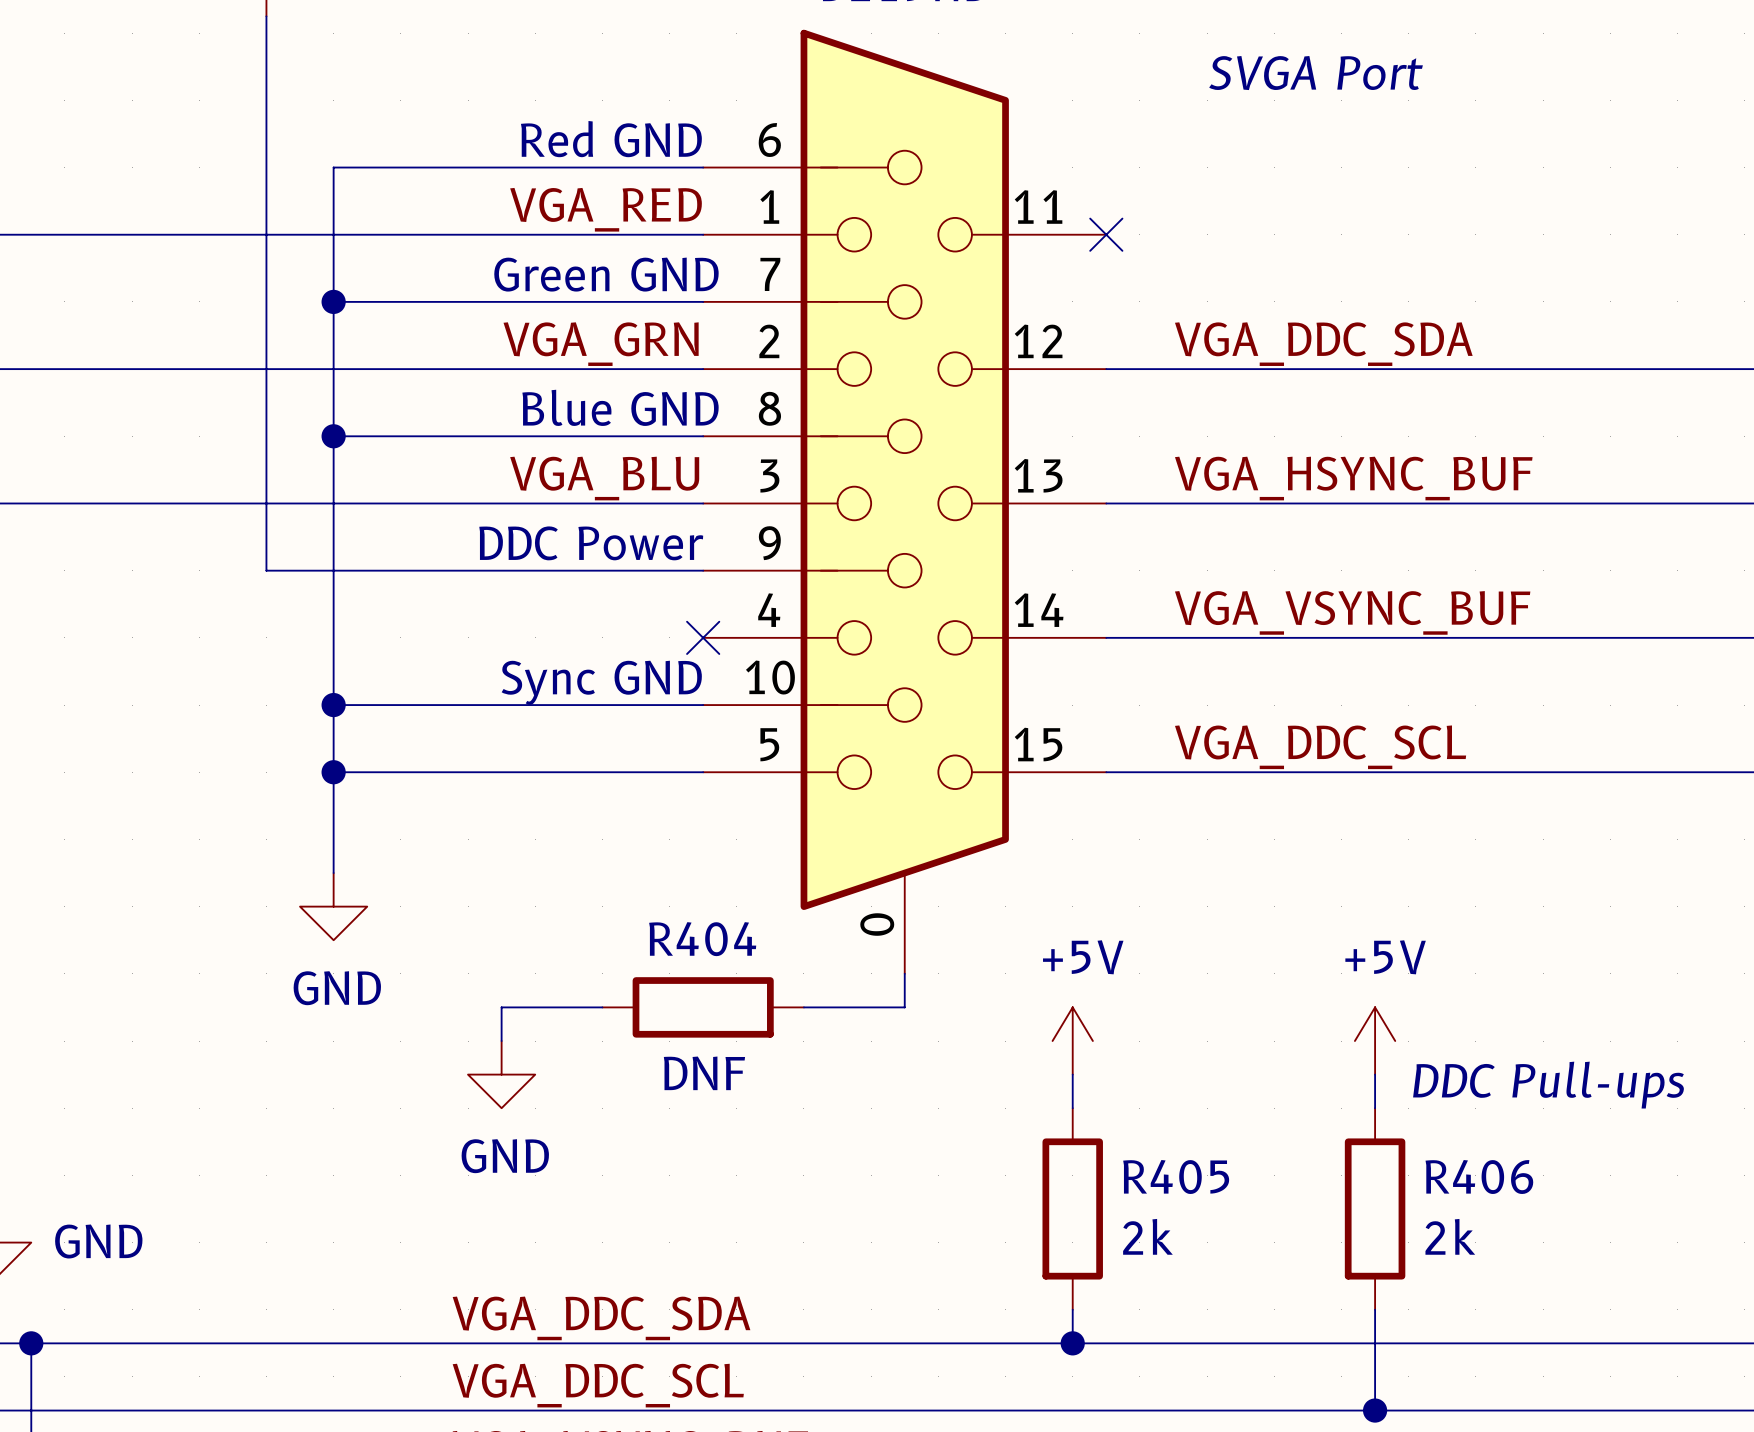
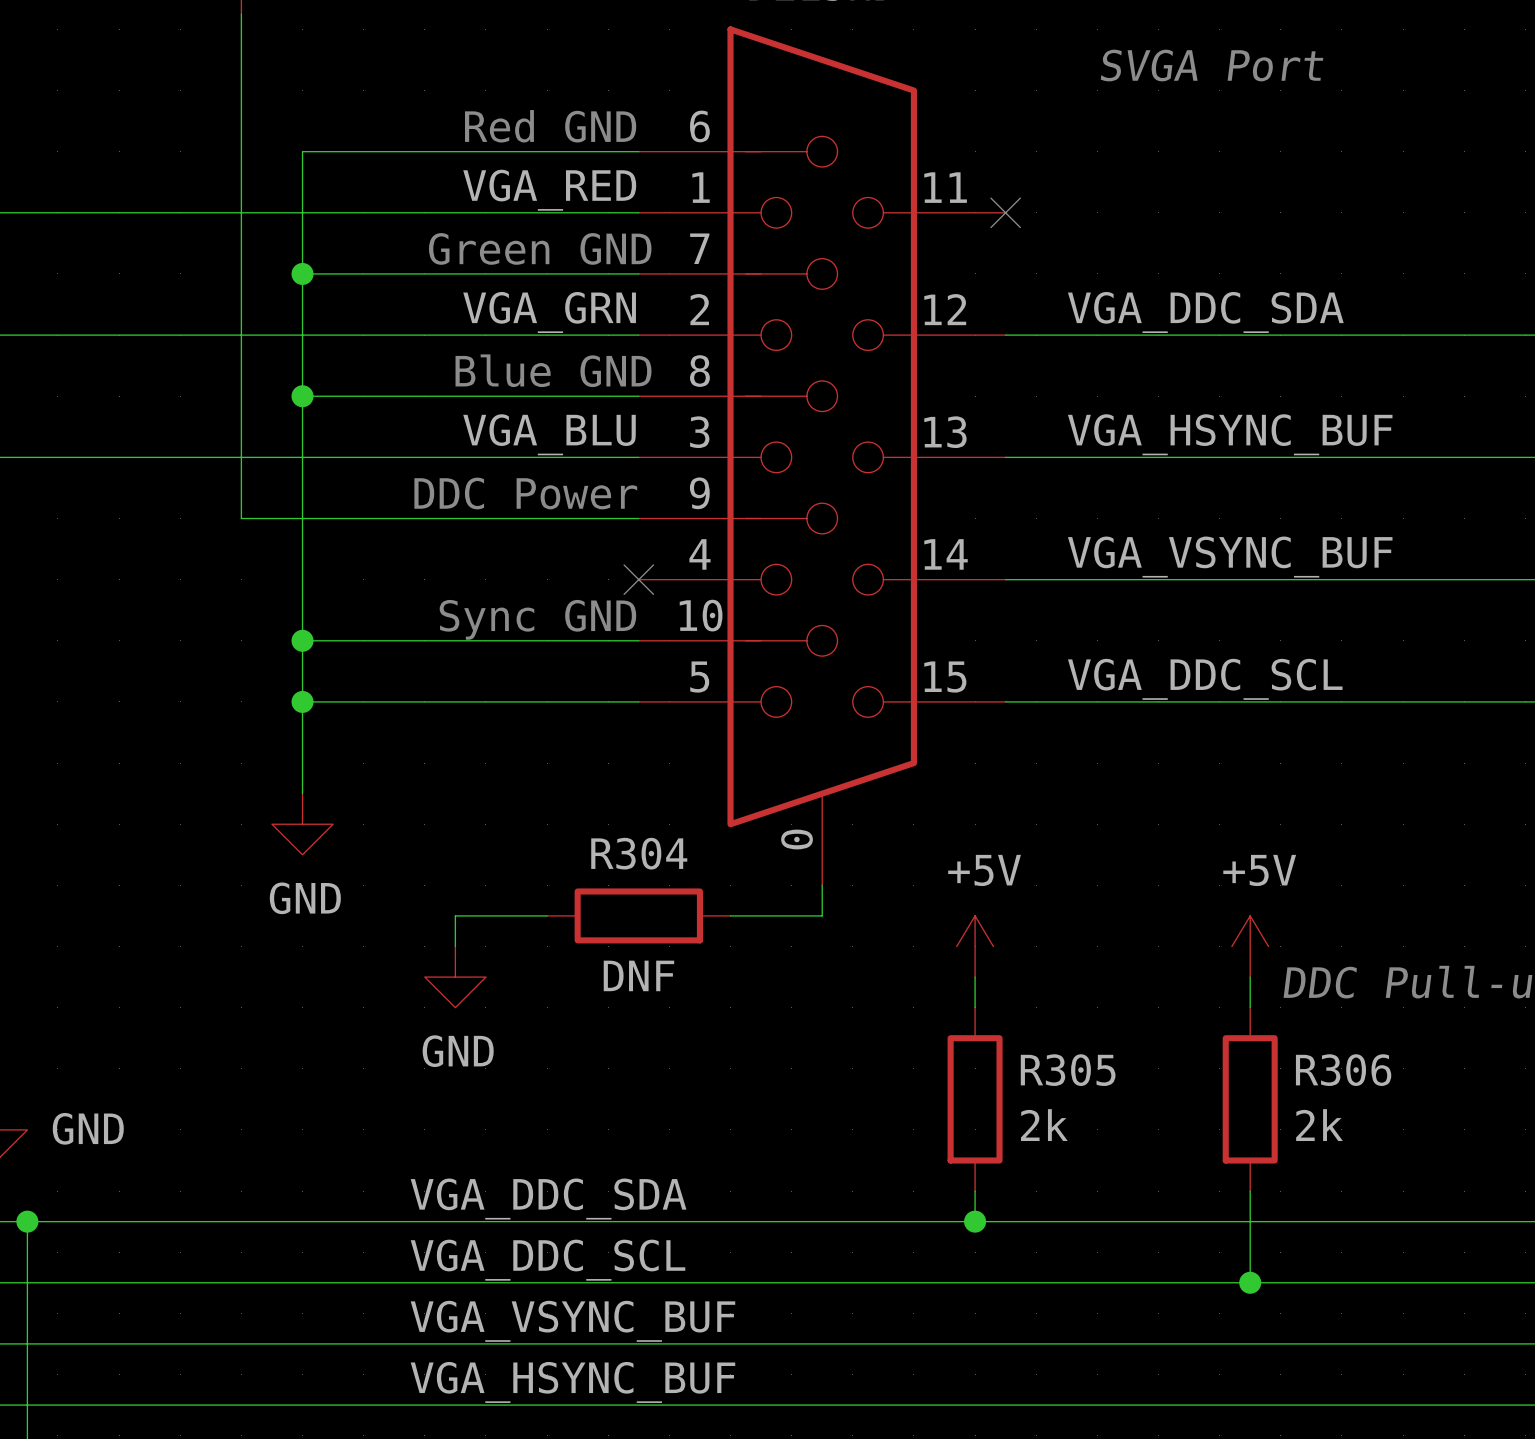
R404 name: R404 (702, 939) -> R304 (639, 853)
R405 name: R405 (1176, 1177) -> R305 (1068, 1070)
R406 name: R406 (1479, 1177) -> R306 (1343, 1070)

